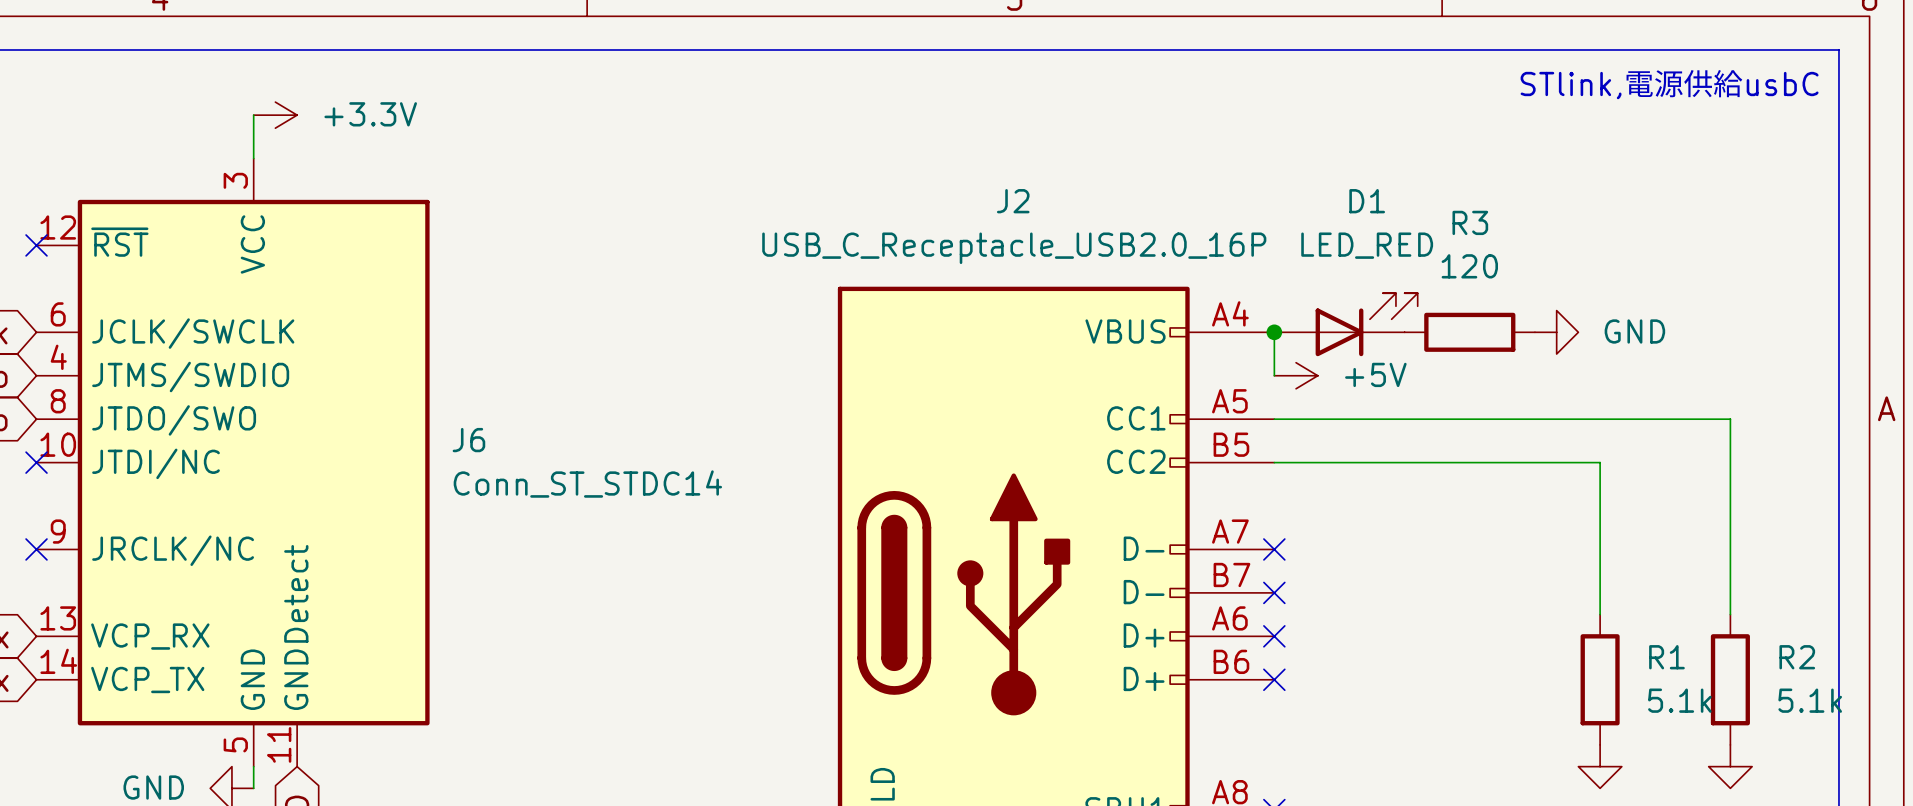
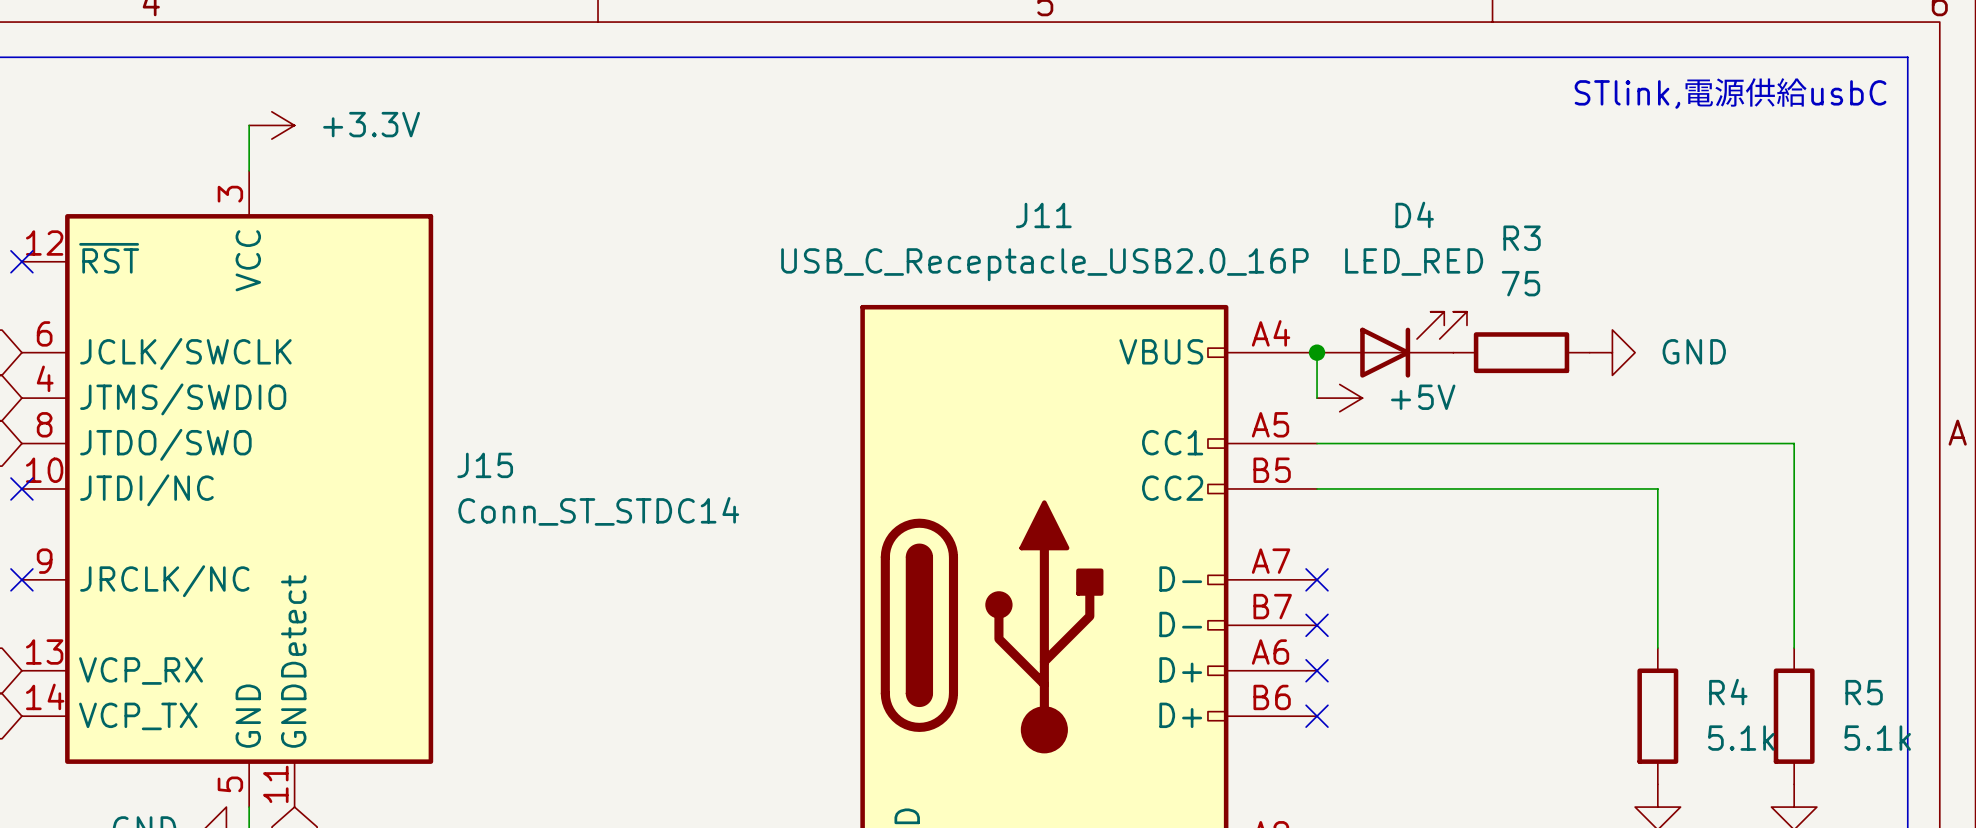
J2 name: J2 (1013, 201) -> J11 (1043, 215)
D1 name: D1 (1367, 201) -> D4 (1414, 214)
R3 value: 120 (1469, 266) -> 75 (1520, 283)
J6 name: J6 (468, 440) -> J15 (485, 465)
R1 name: R1 (1666, 657) -> R4 (1728, 692)
R2 name: R2 (1797, 657) -> R5 (1864, 692)

